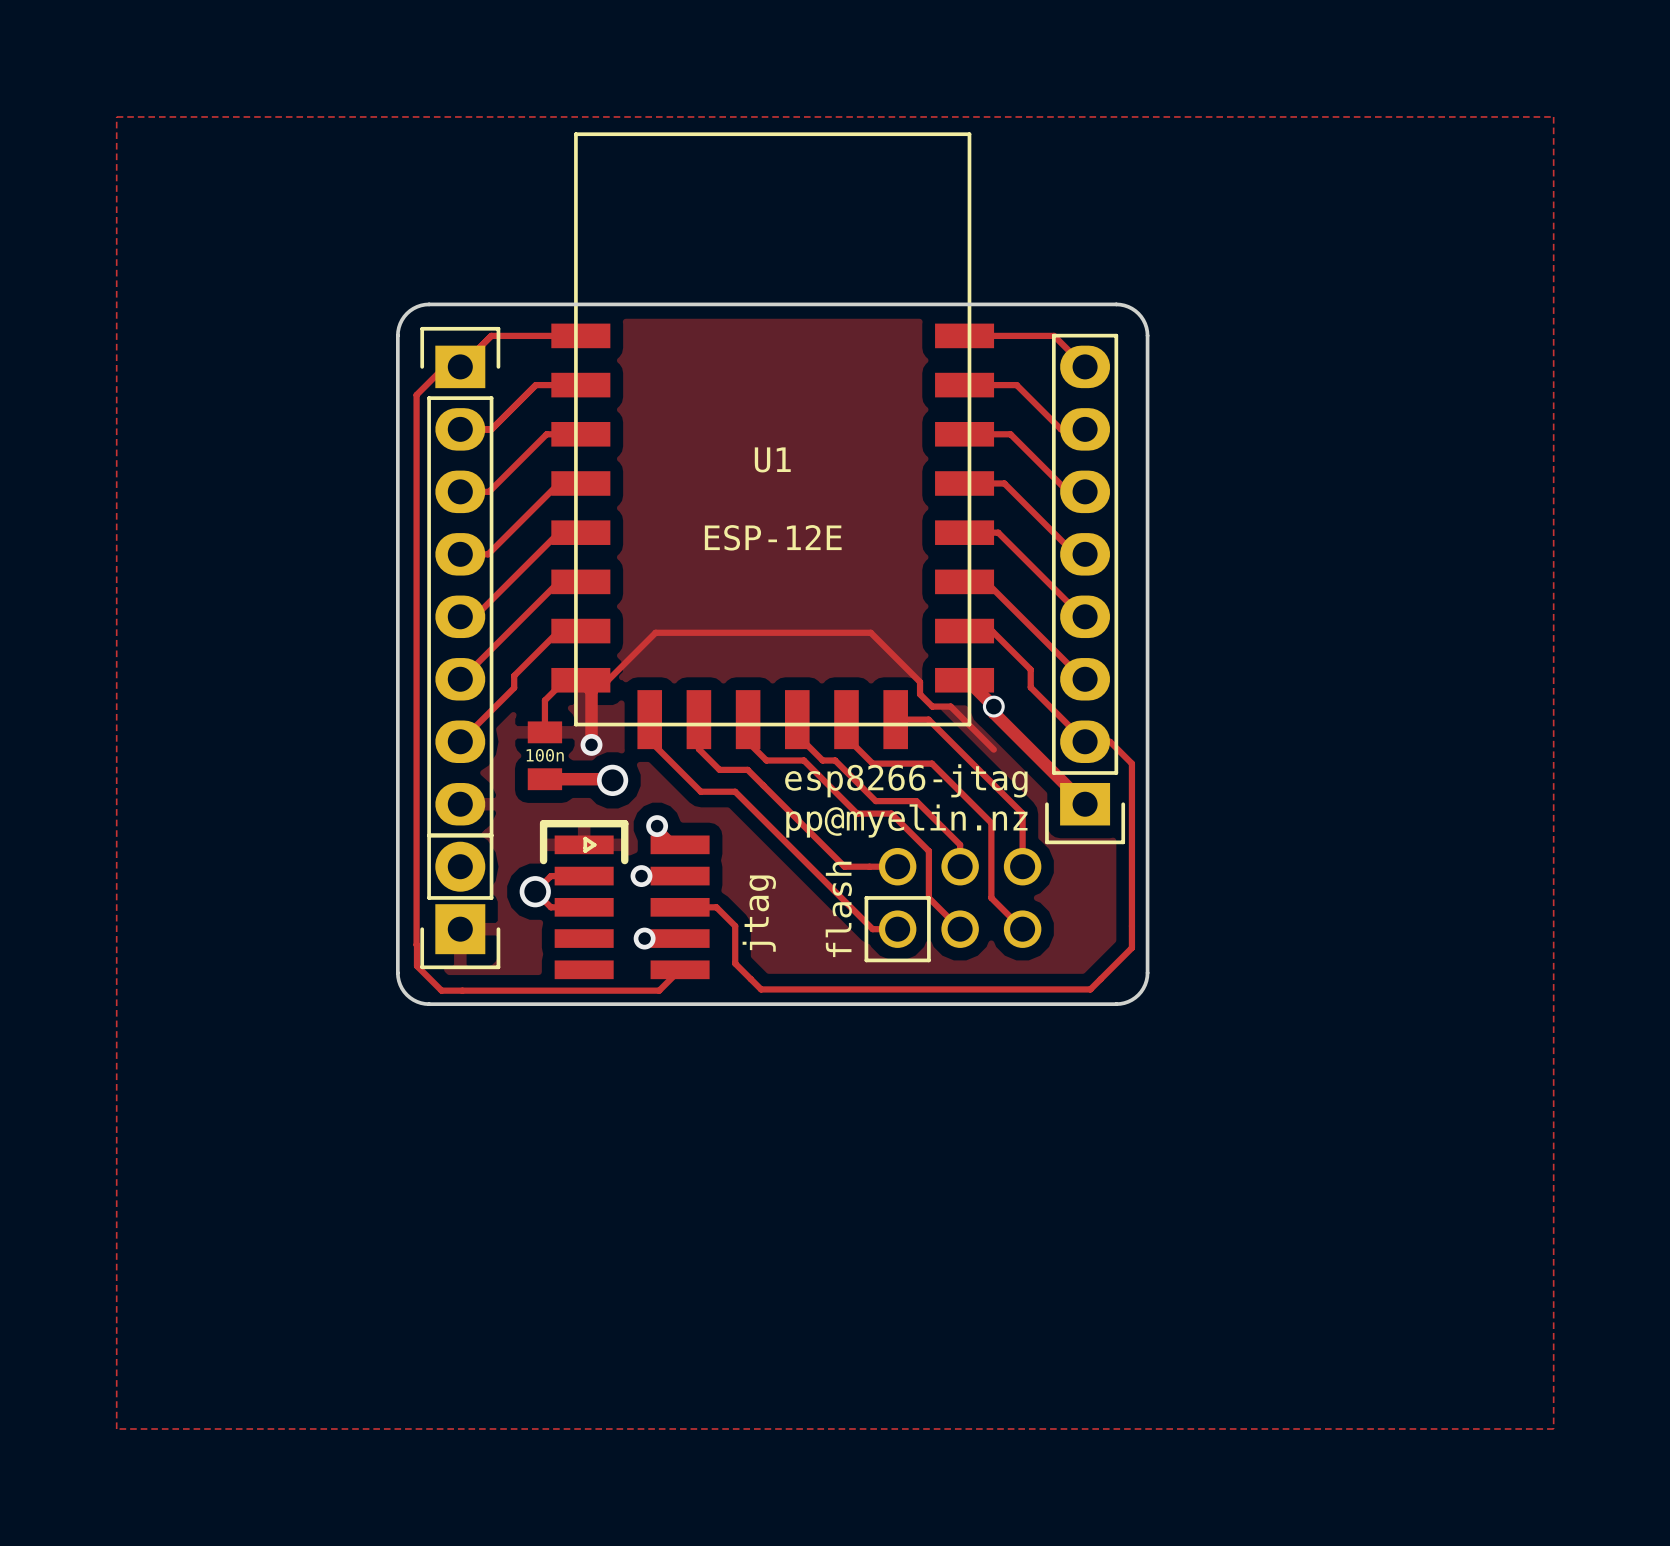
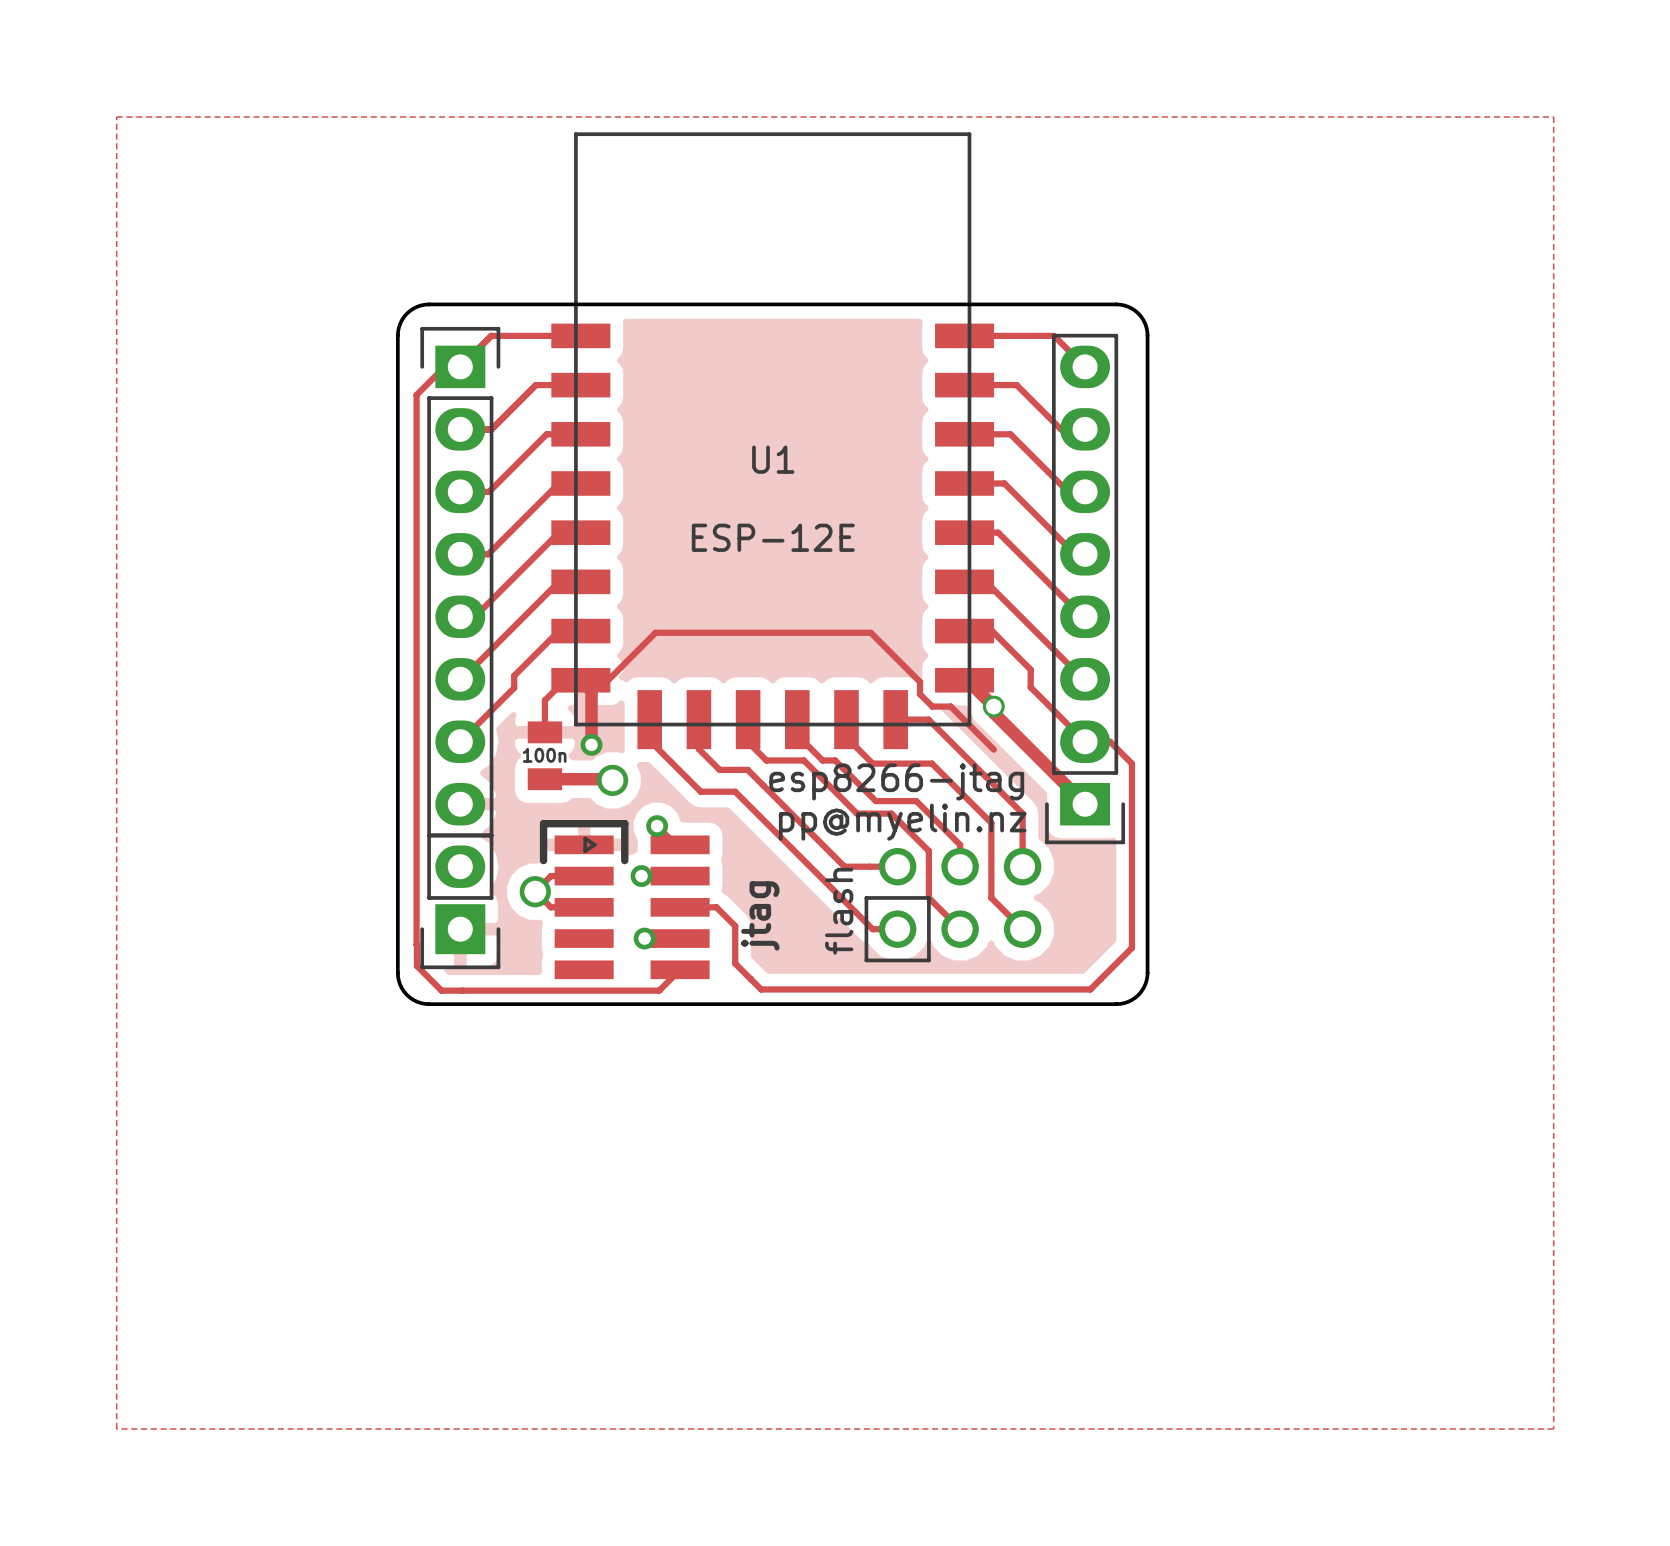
part footprint: [420, 833, 501, 970] -> [420, 833, 501, 970]

